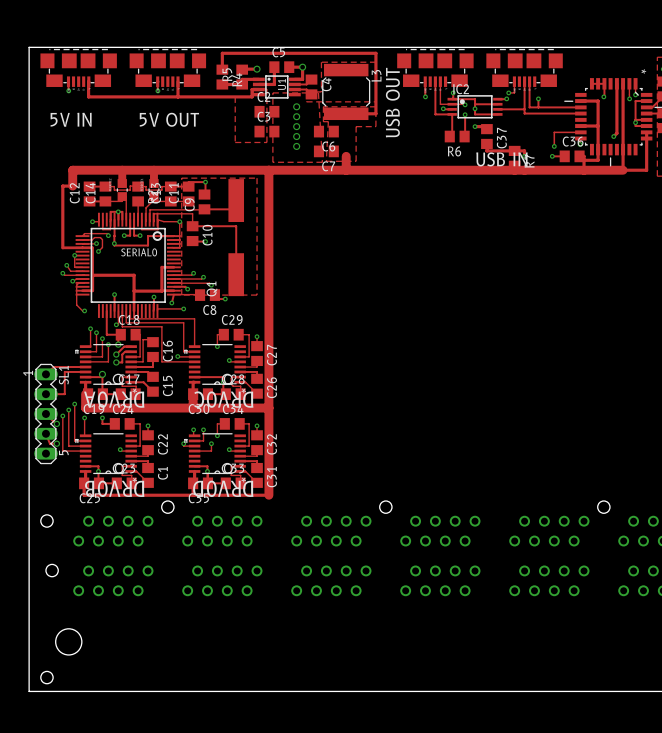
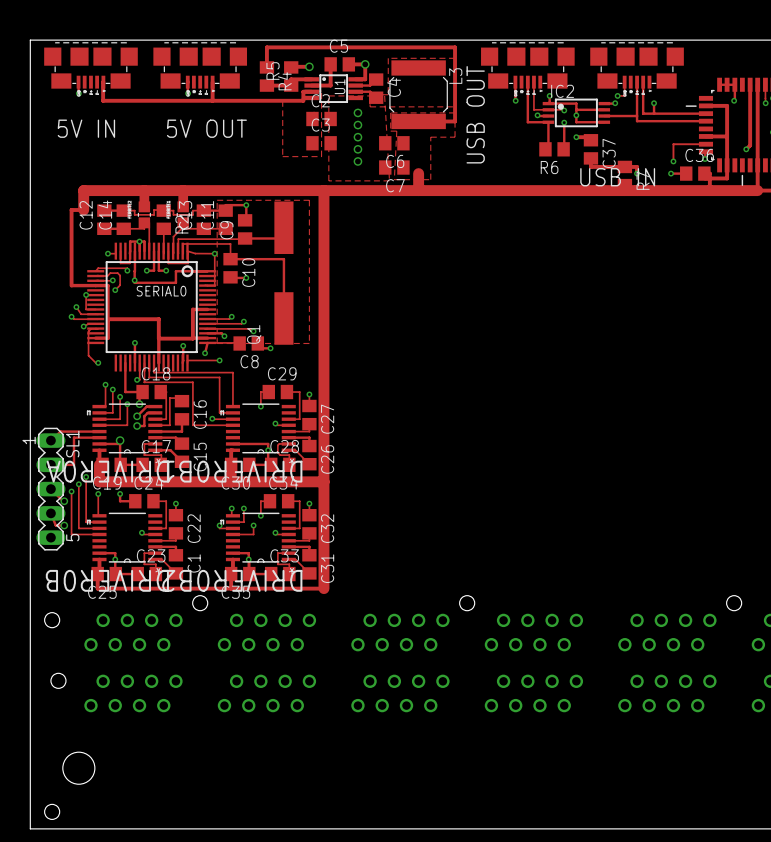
DRV0A: (106, 364) -> none
DRIVER0A: none -> (124, 428)
DRV0C: (215, 364) -> none
DRIVER0B1: none -> (258, 428)
DRV0B: (106, 453) -> none
DRIVER0B: none -> (124, 537)
DRV0D: (215, 453) -> none
DRIVER0B2: none -> (258, 537)

